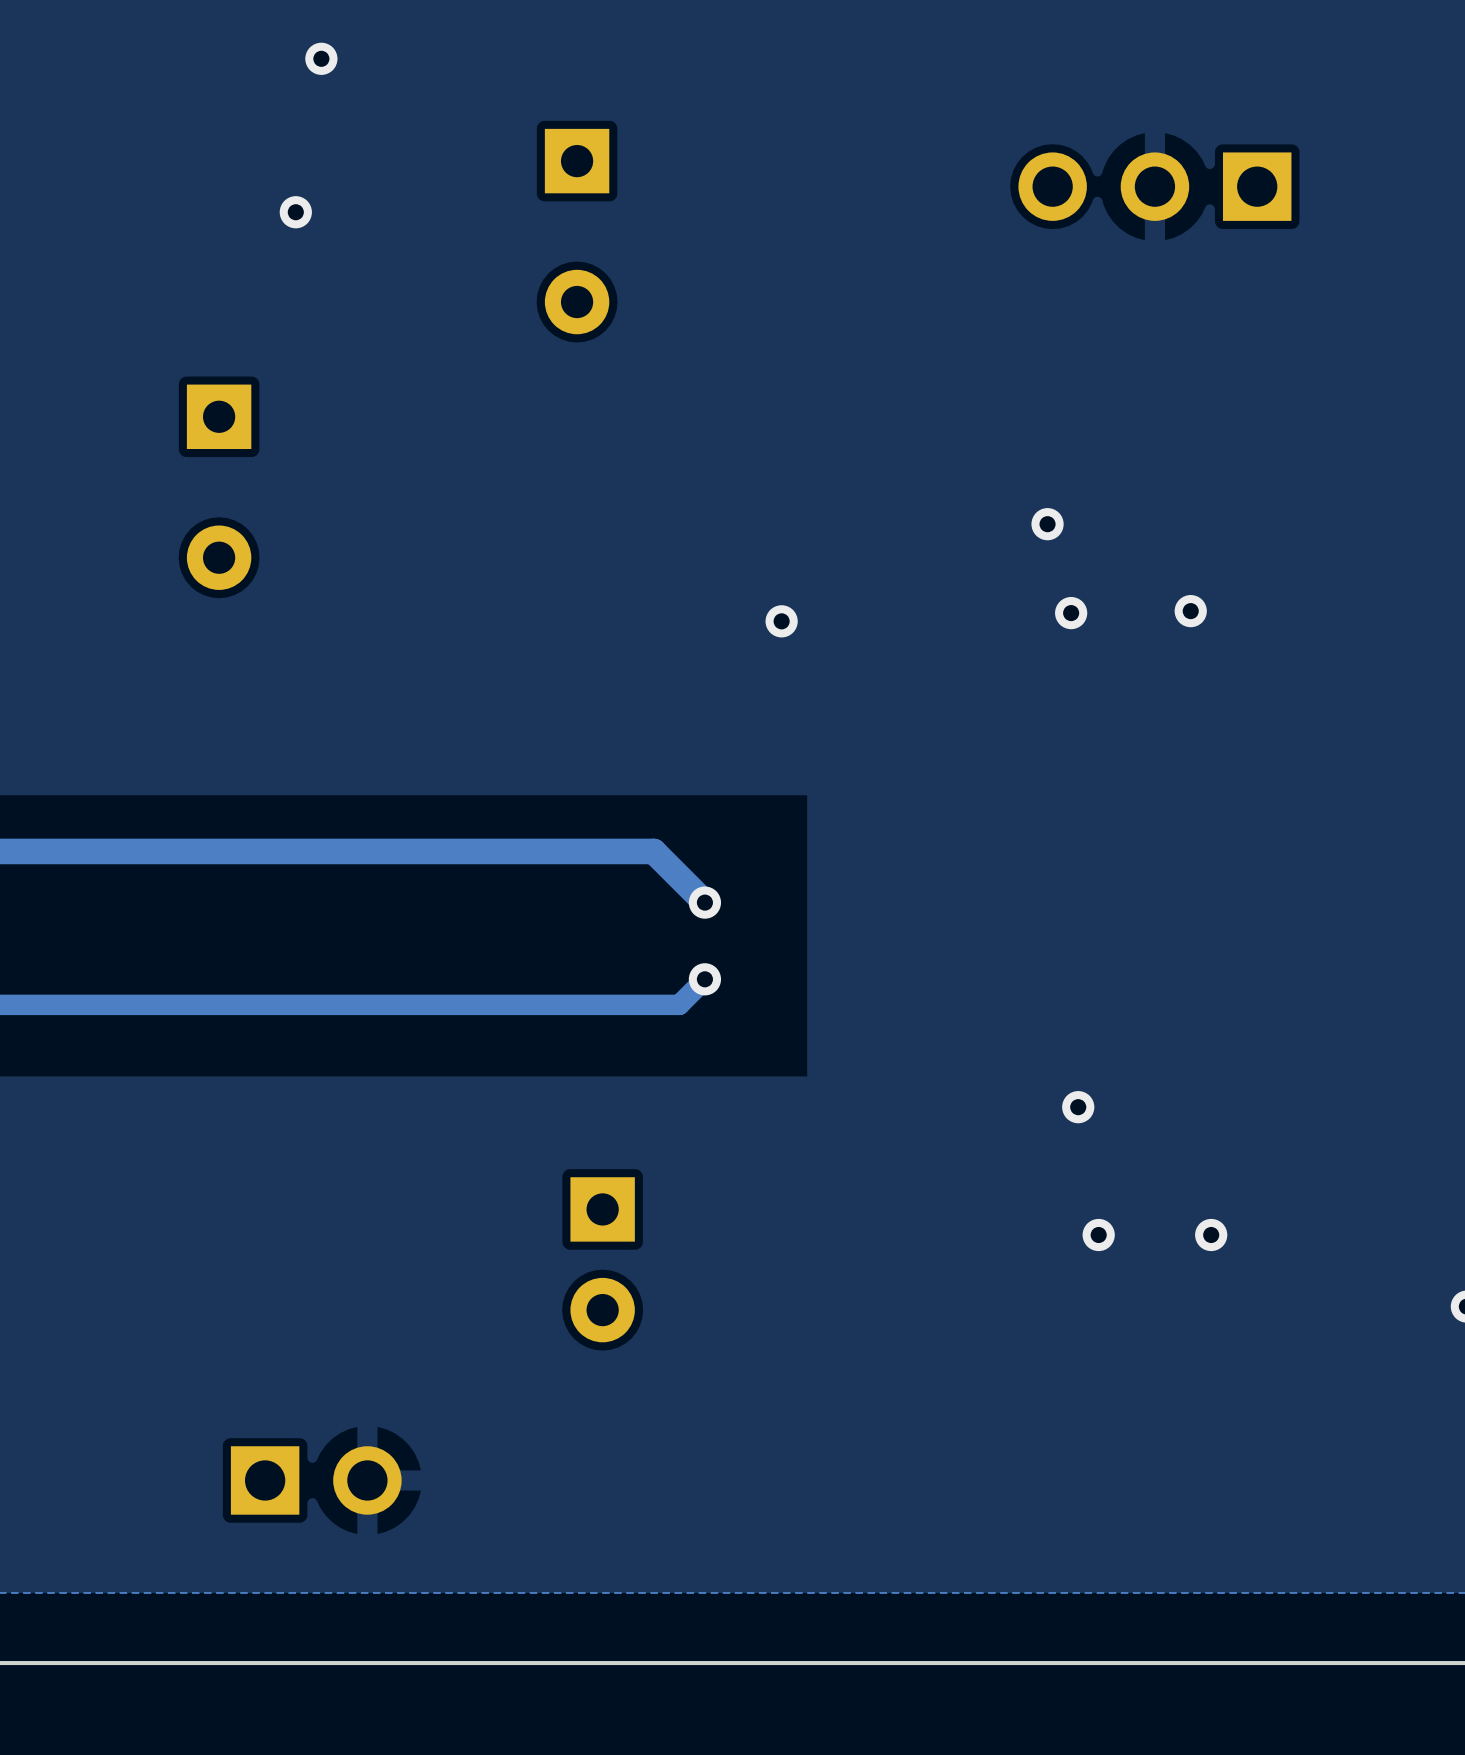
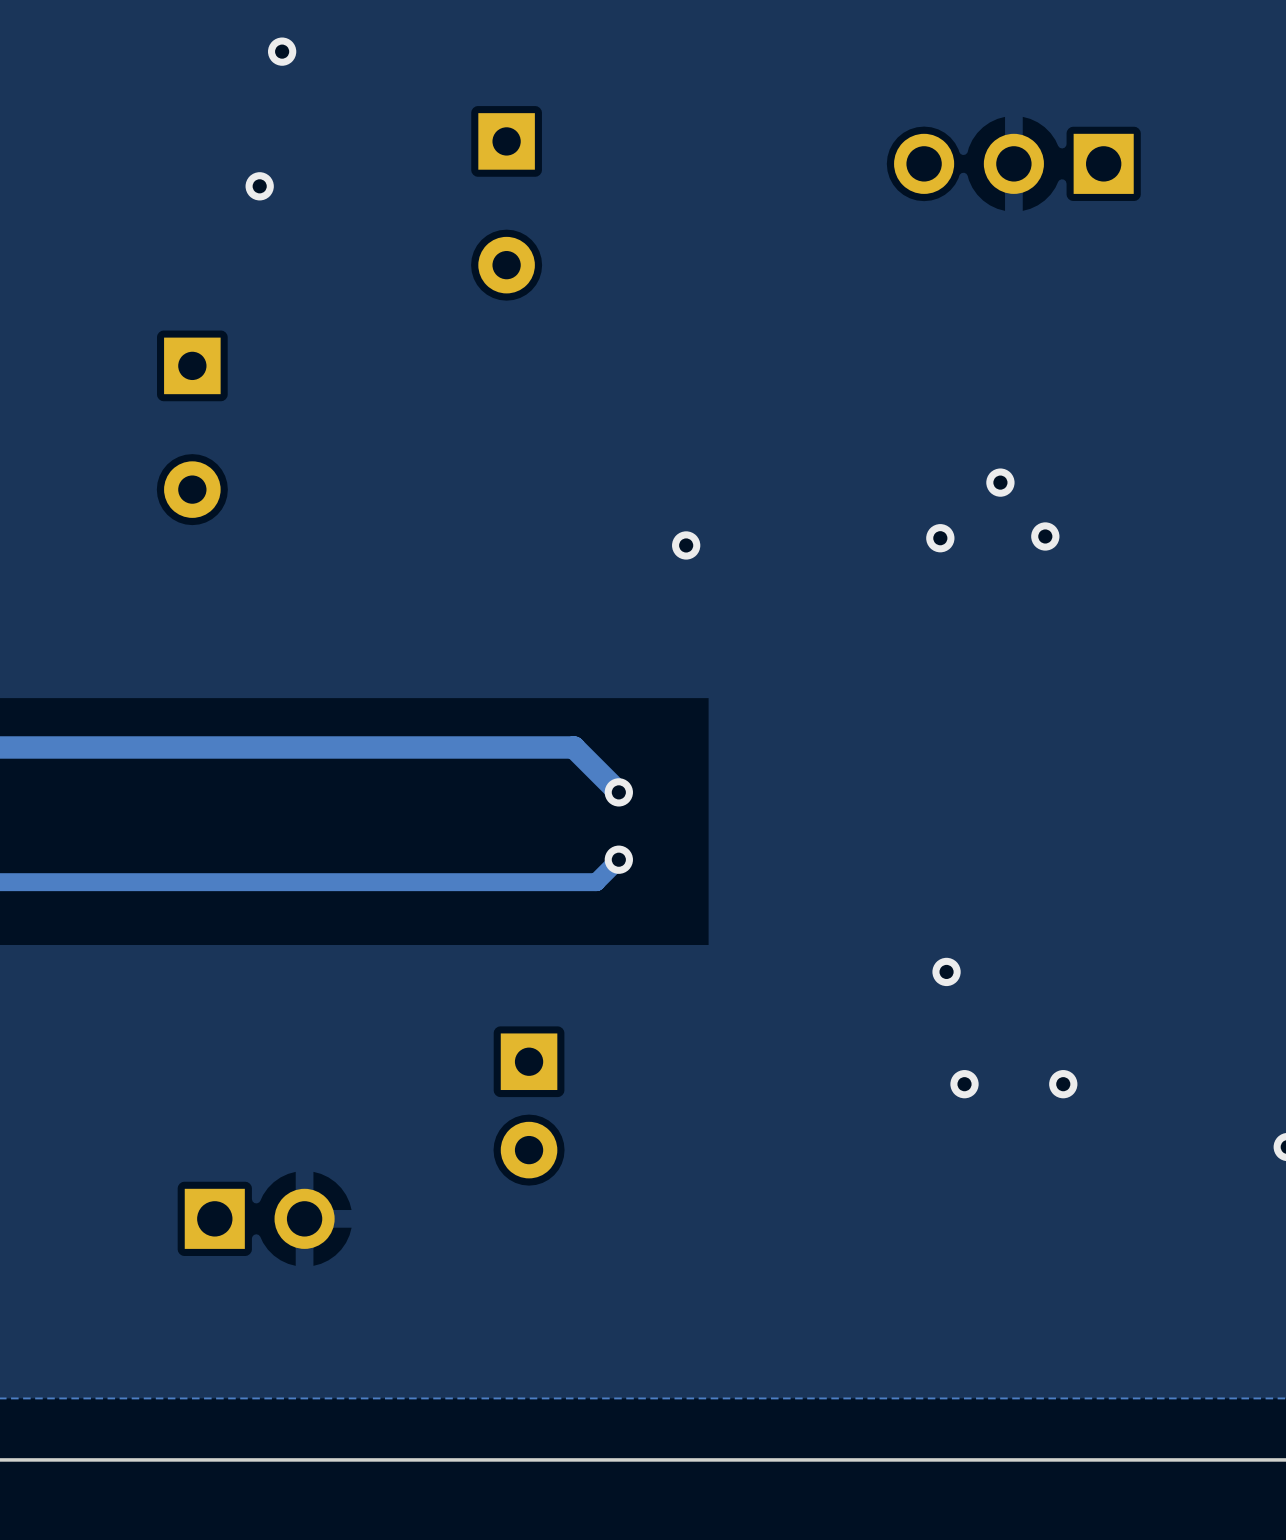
via position: (1047, 524) -> (1000, 482)
part position: (316, 1480) -> (259, 1218)

